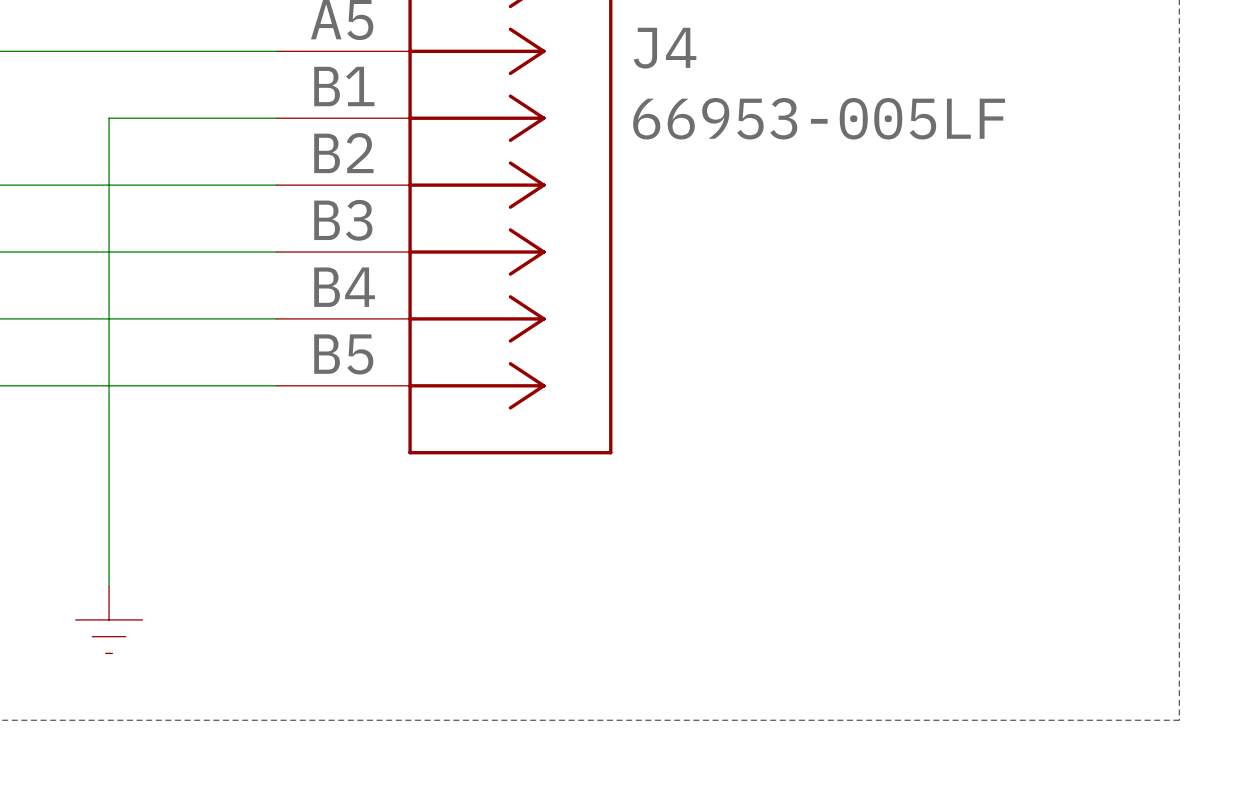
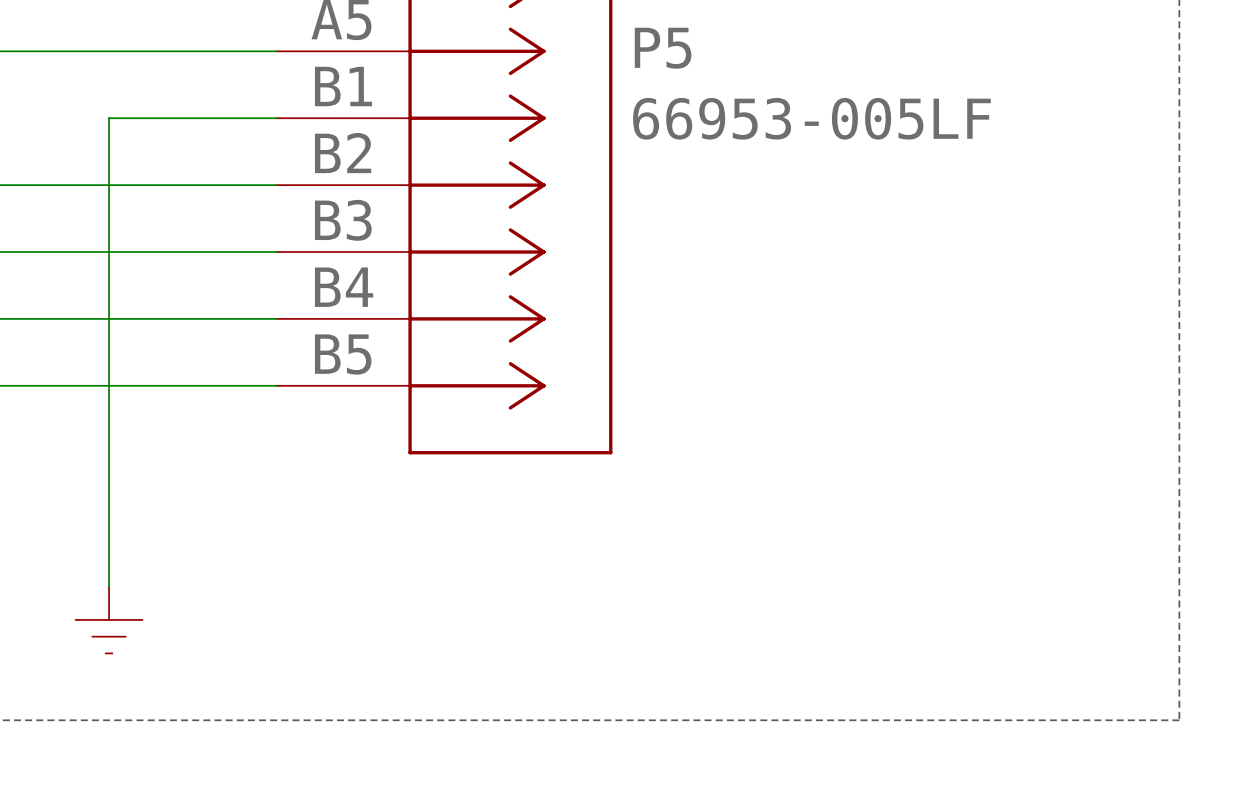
J4 name: J4 (665, 48) -> P5 (663, 48)

